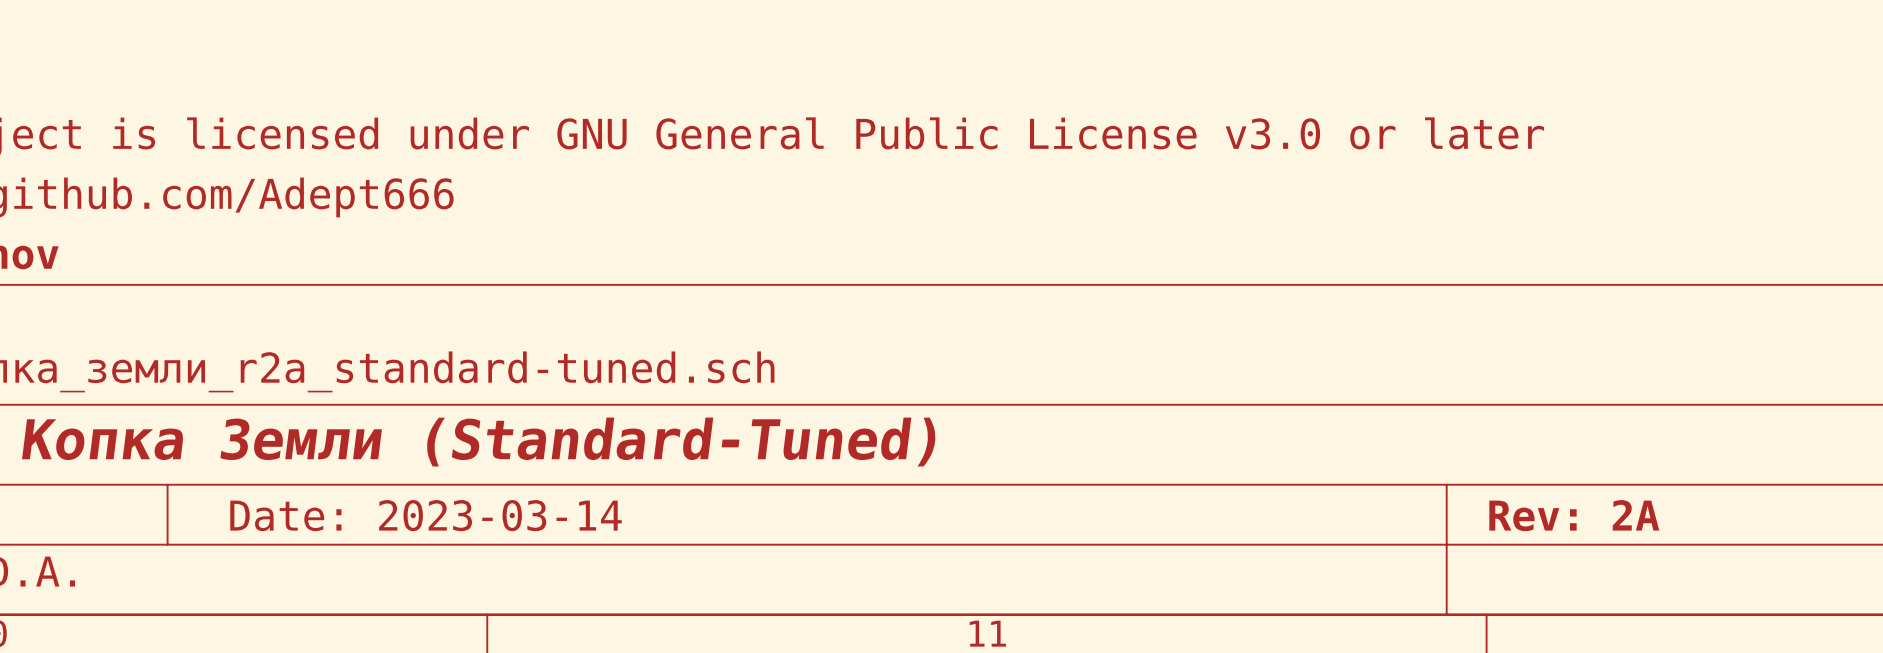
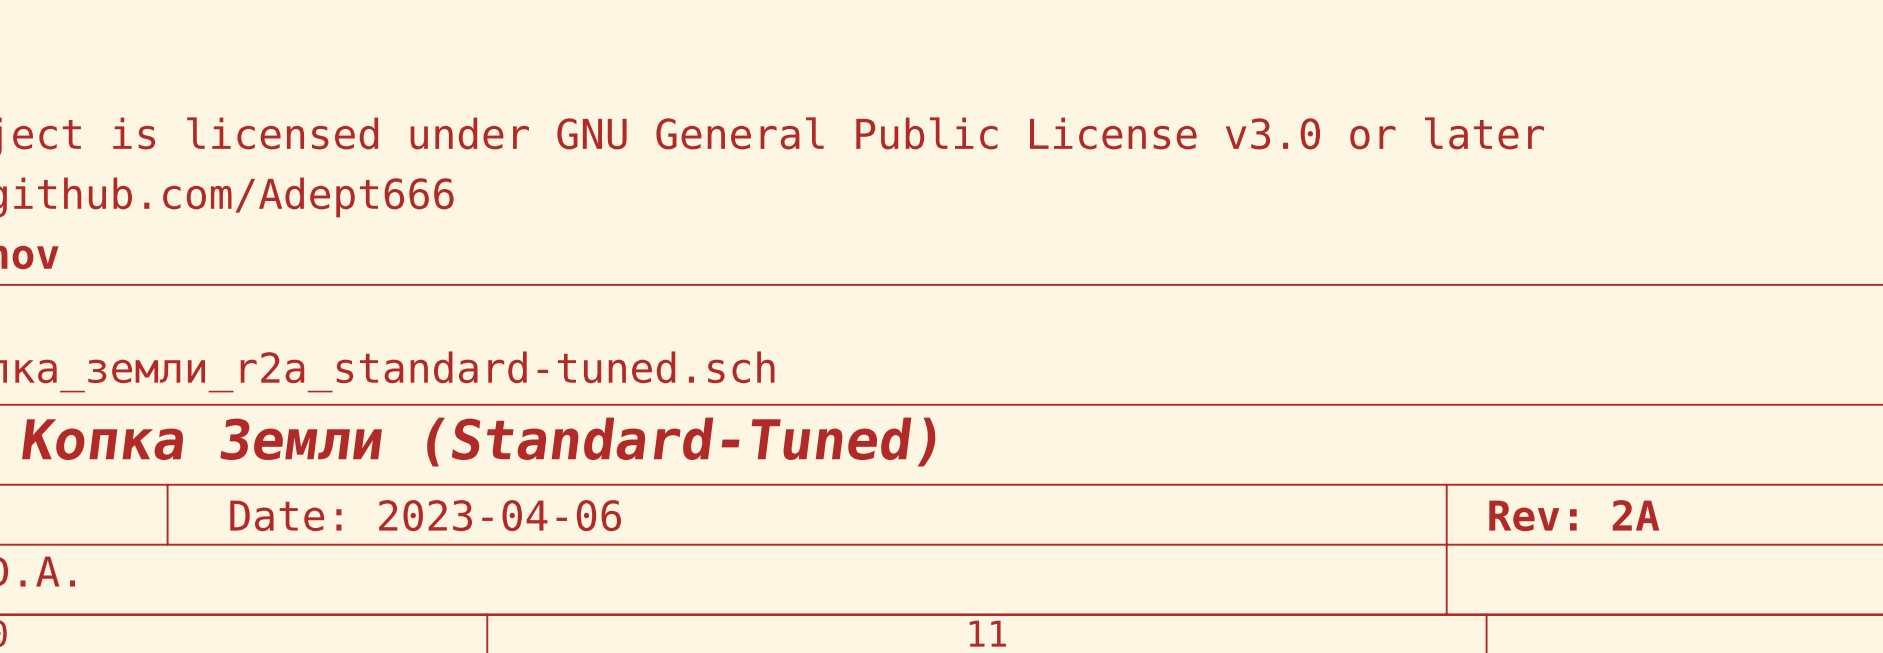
title block: Date: 2023-03-14 (425, 515) -> Date: 2023-04-06 (425, 515)

